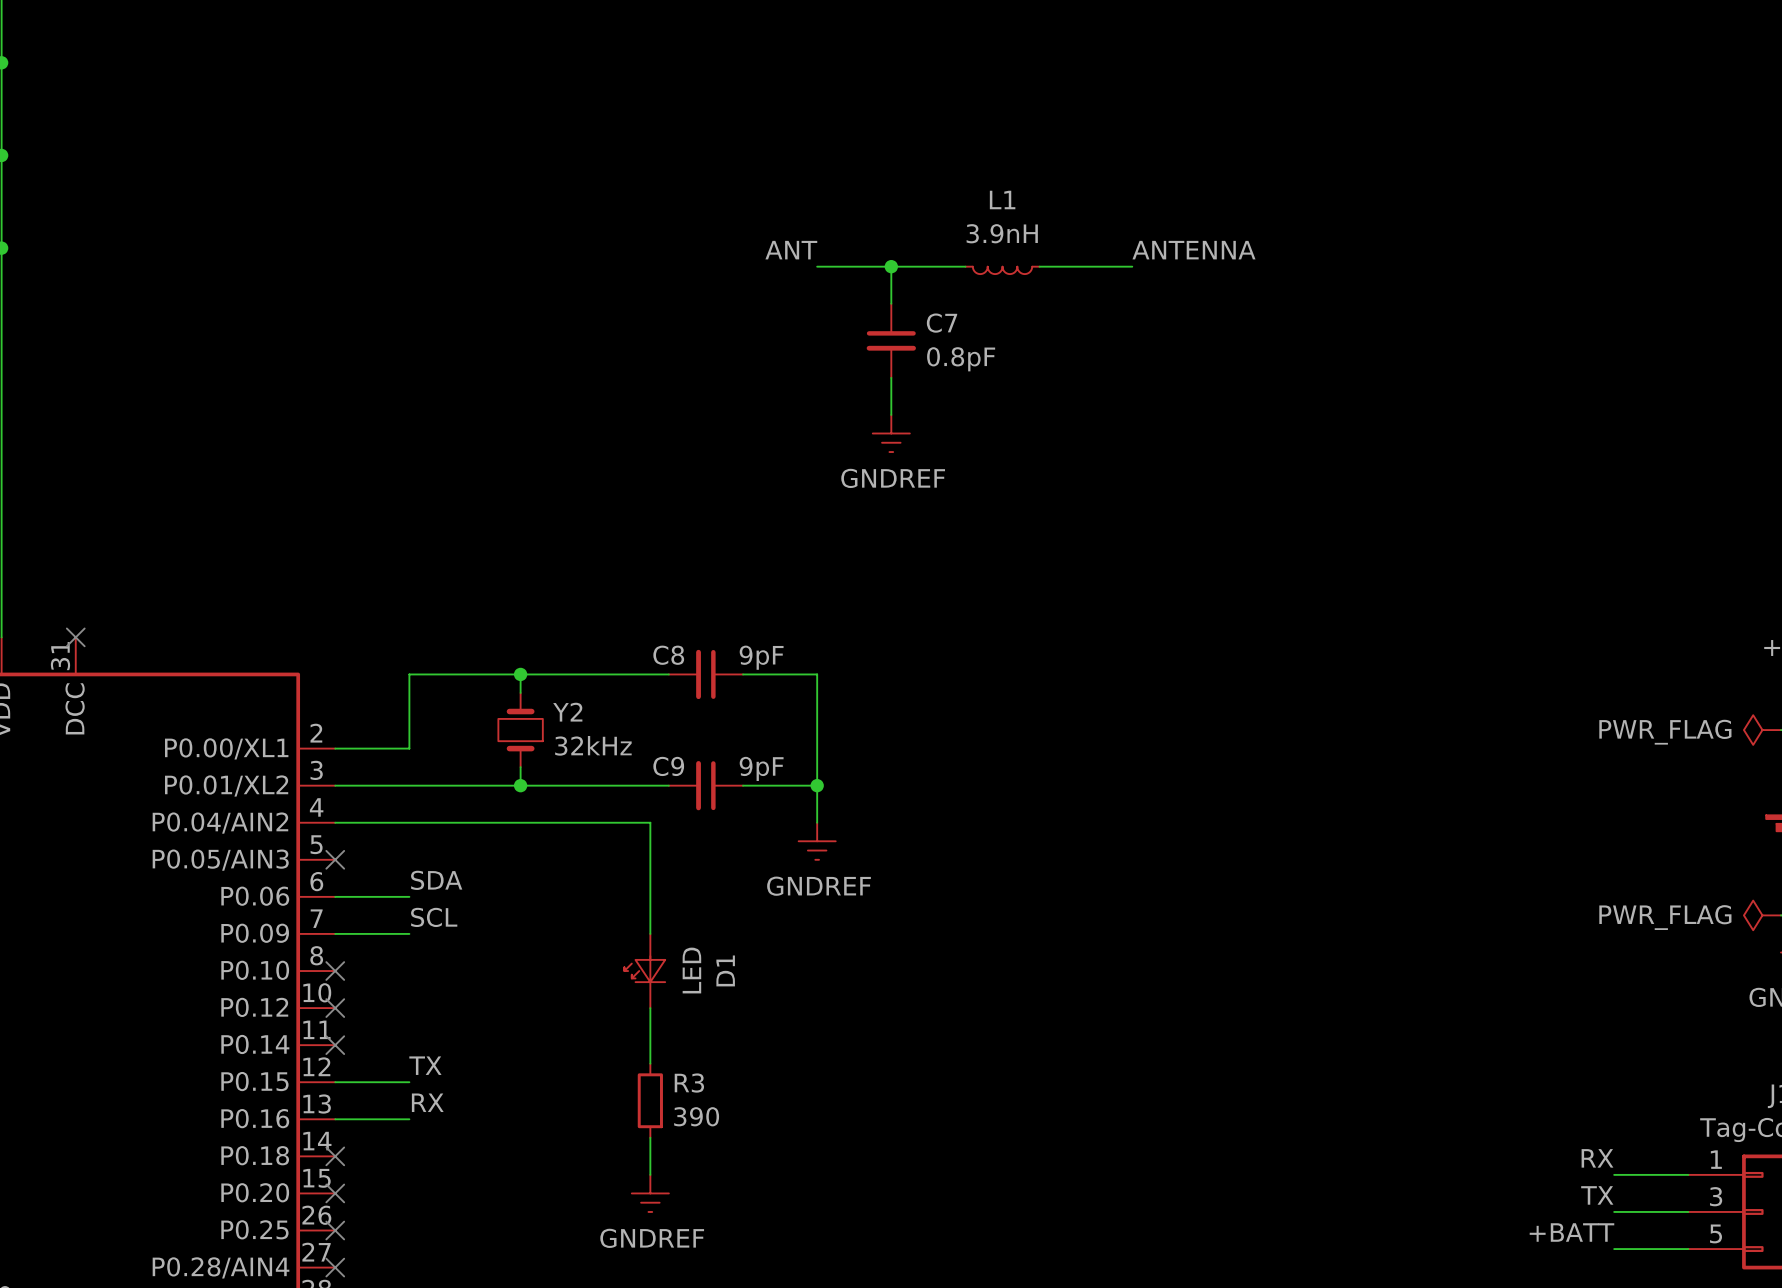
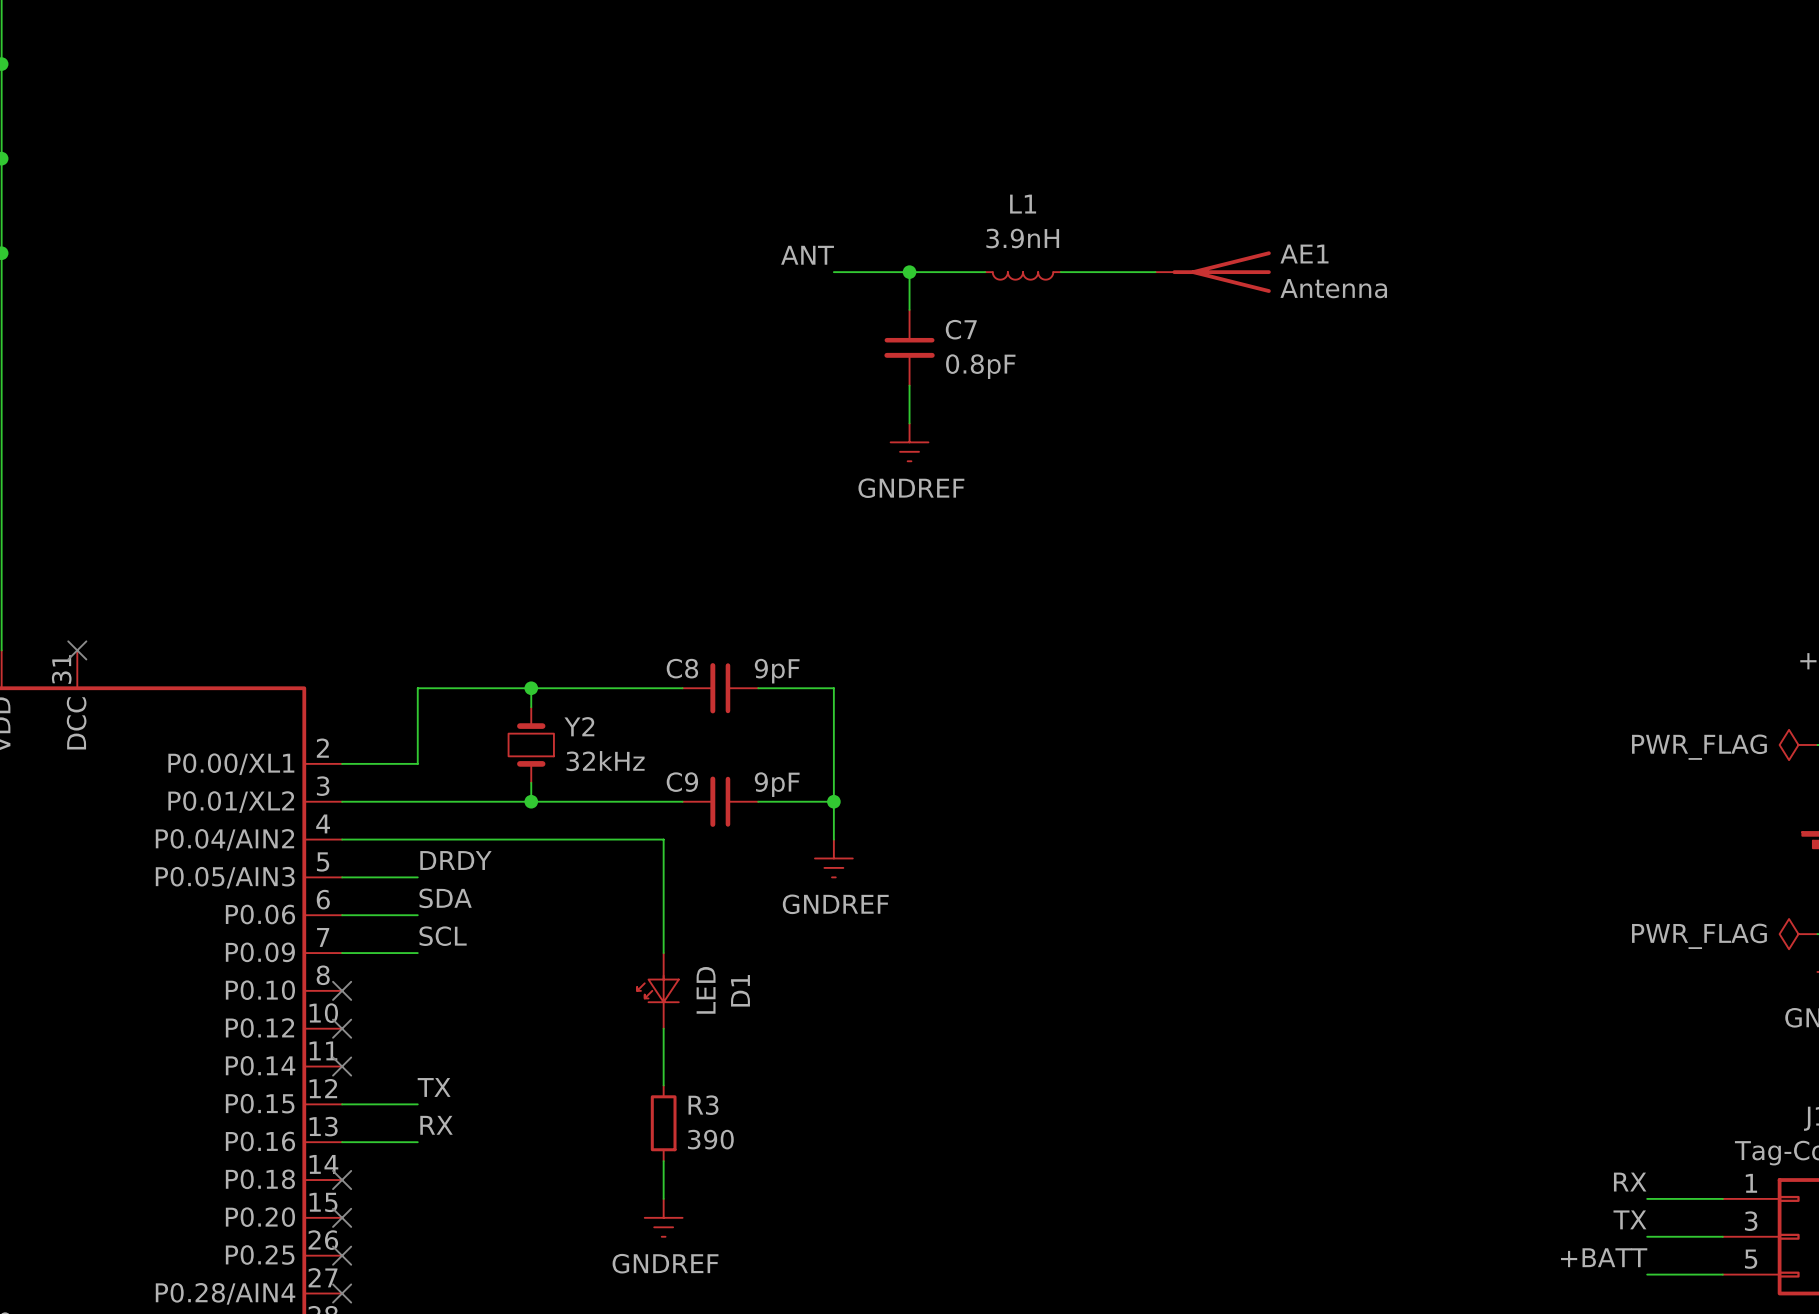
label: ANTENNA (1193, 250) -> none
AE1: none -> Antenna (1213, 272)
label: none -> DRDY (455, 860)
wire: none -> (342, 877) (417, 877)
no-connect mark: (335, 859) -> none

